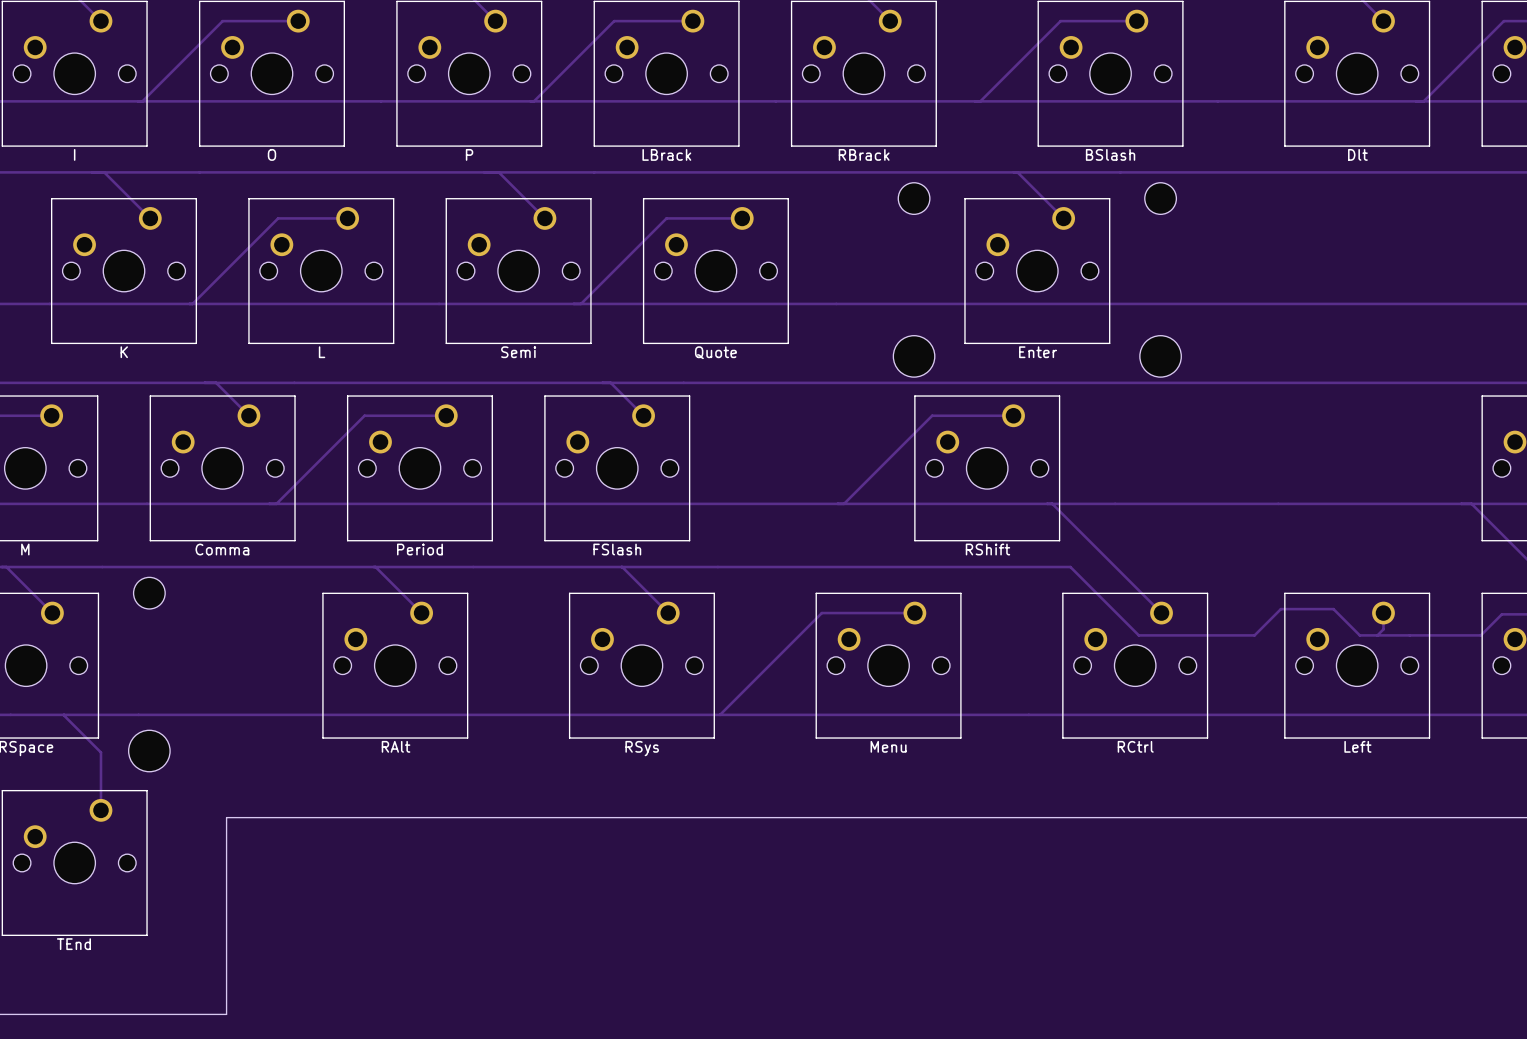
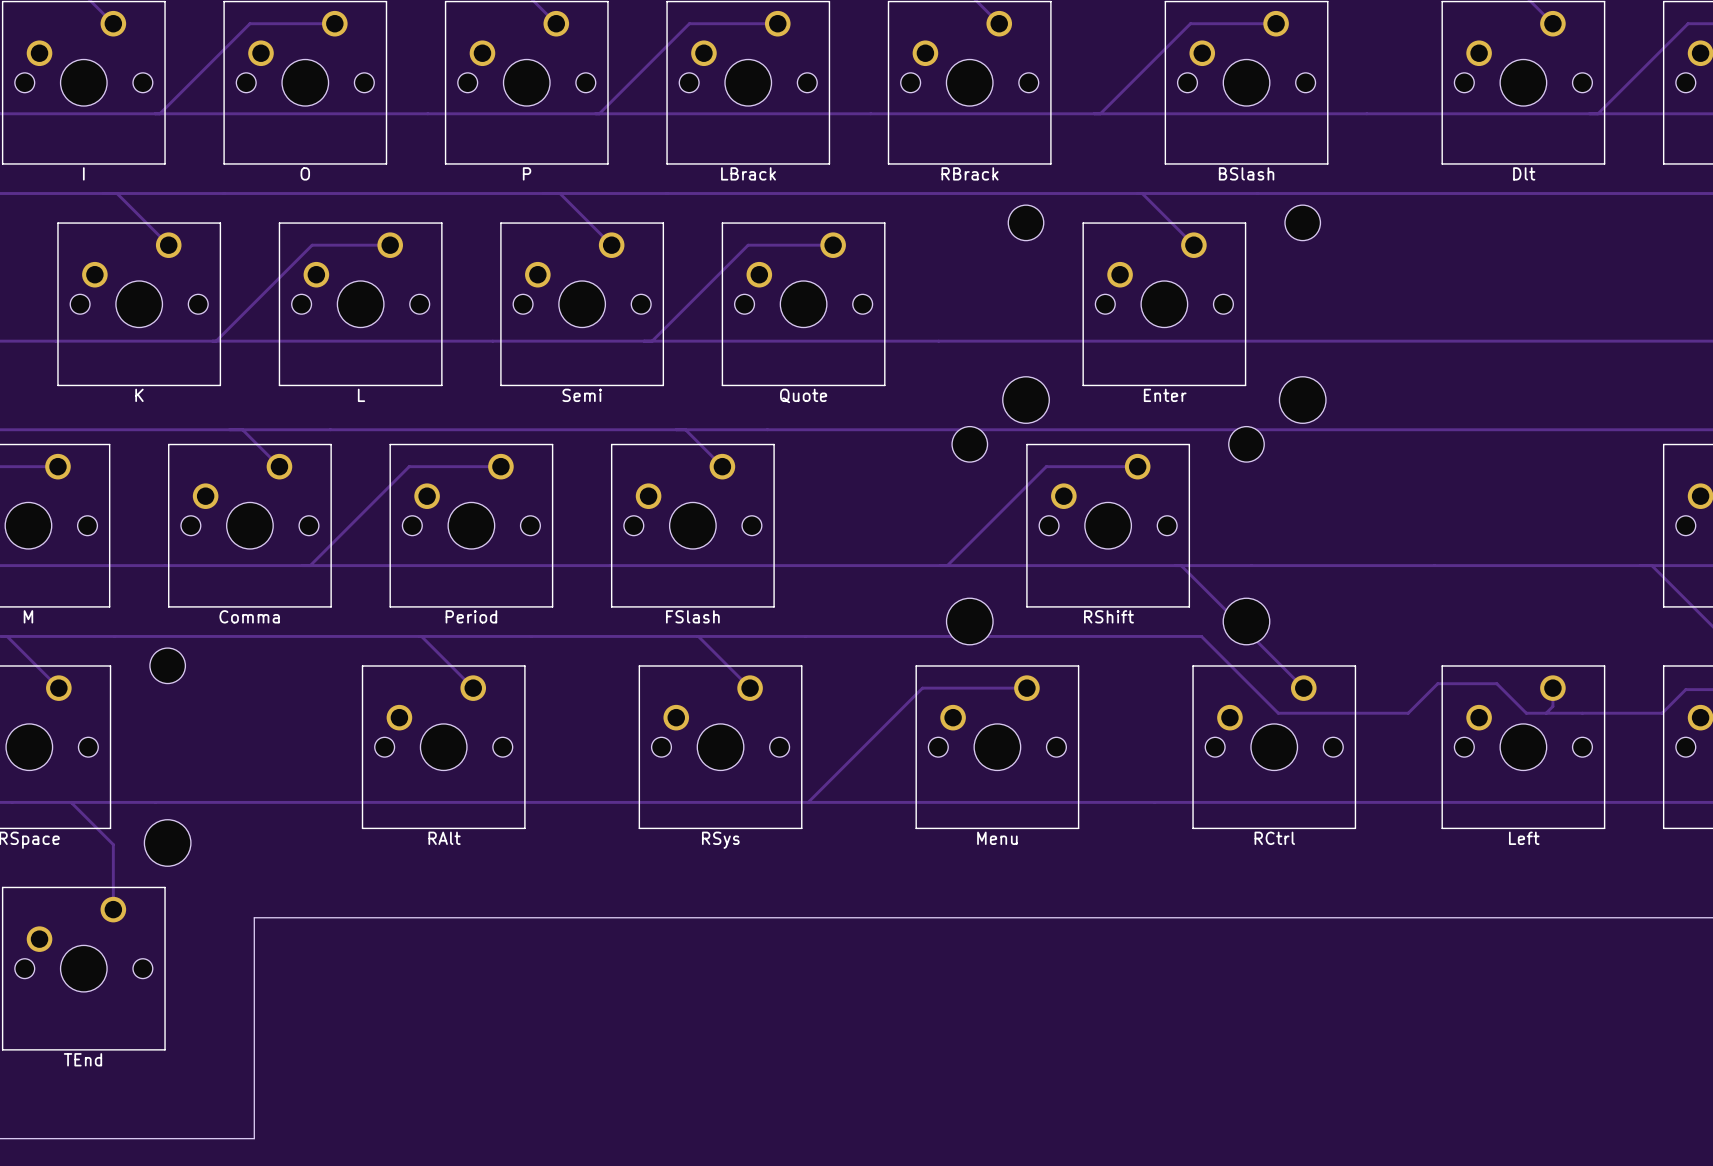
part footprint: [914, 395, 1061, 542] -> [946, 426, 1270, 645]

